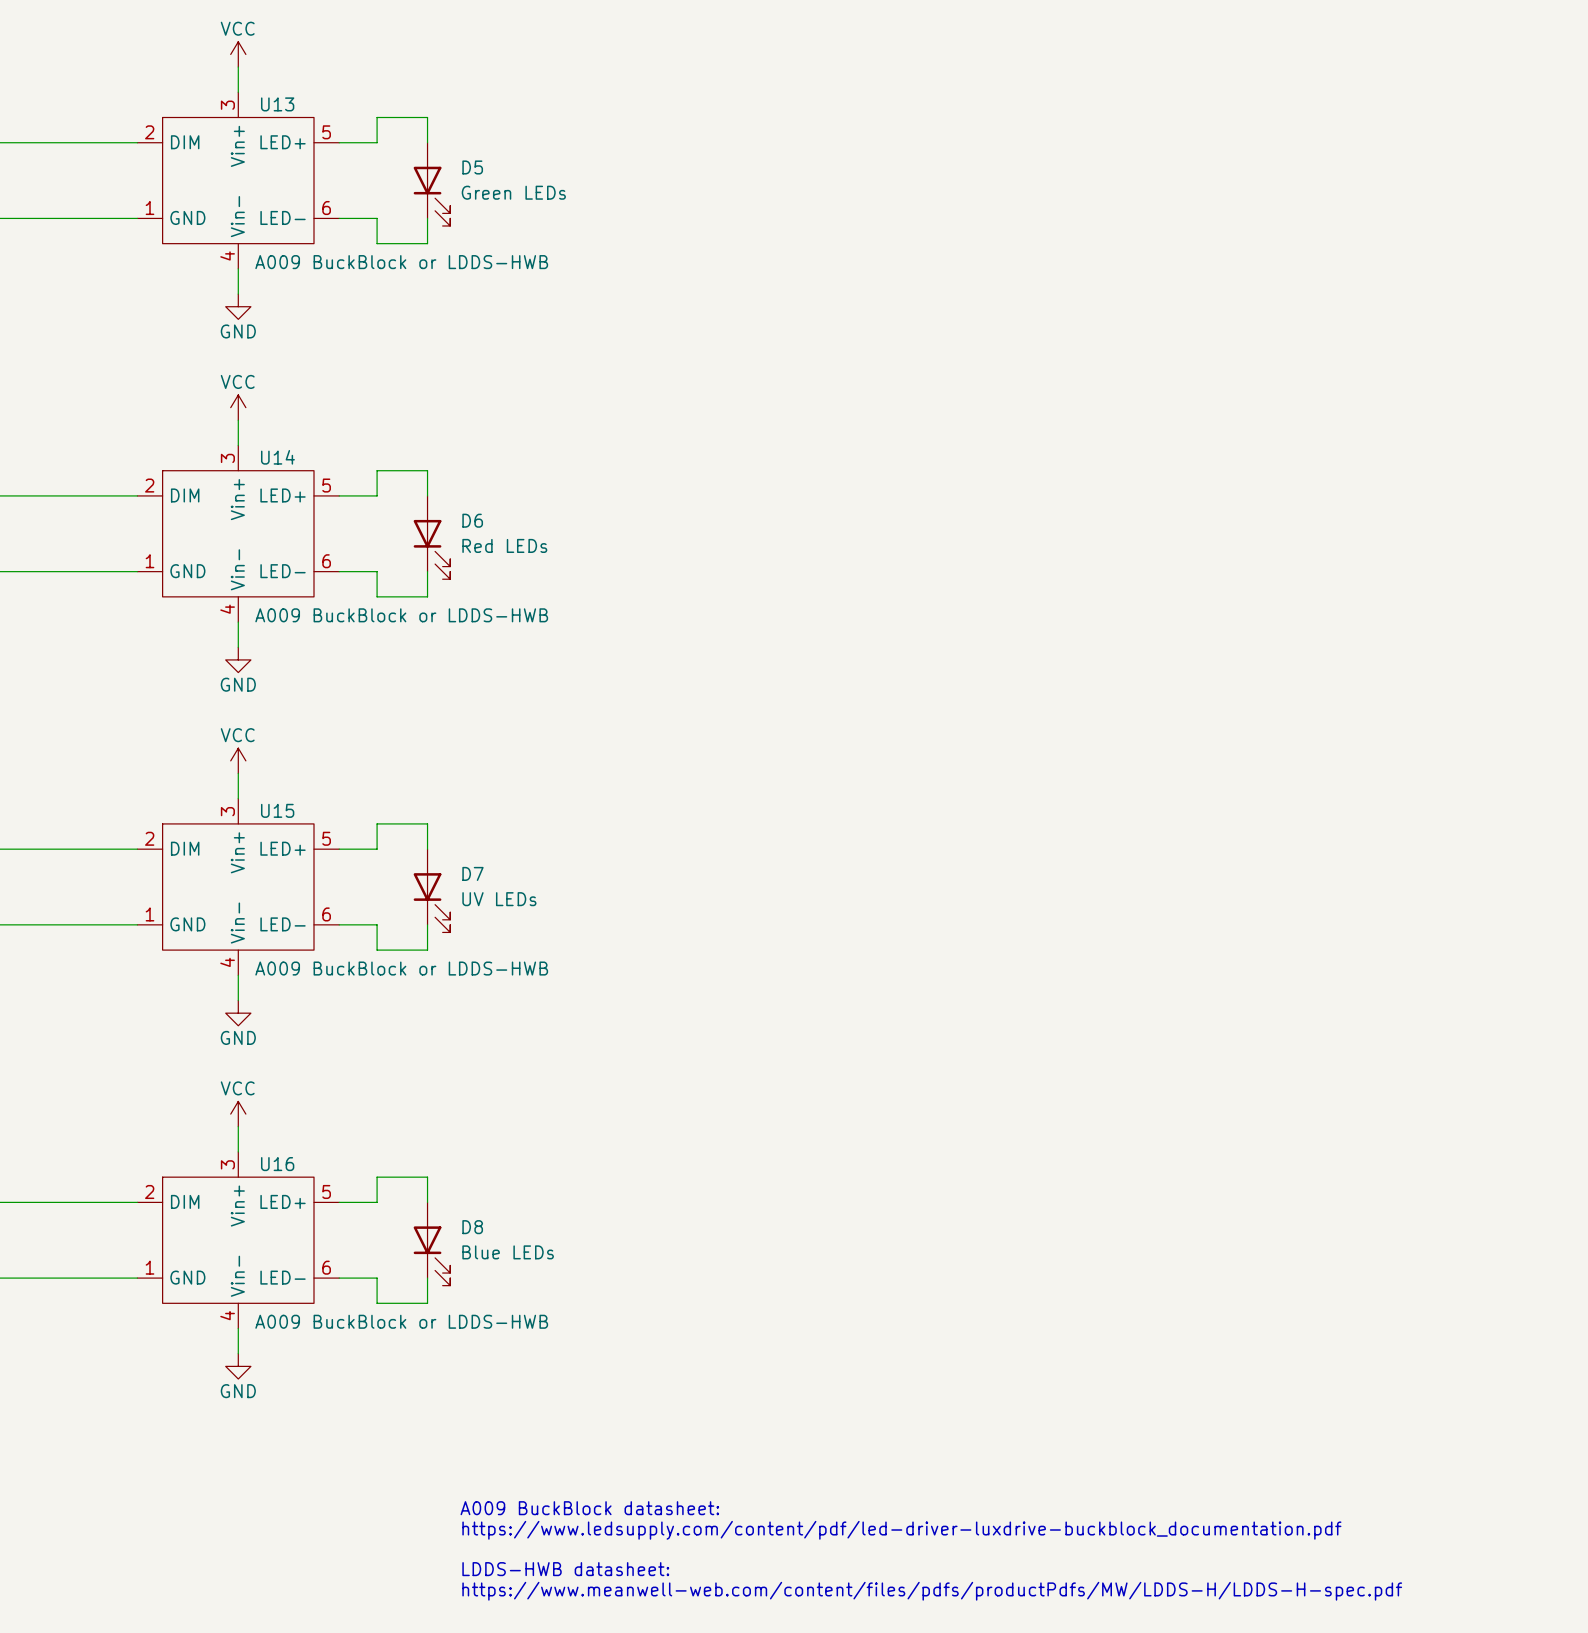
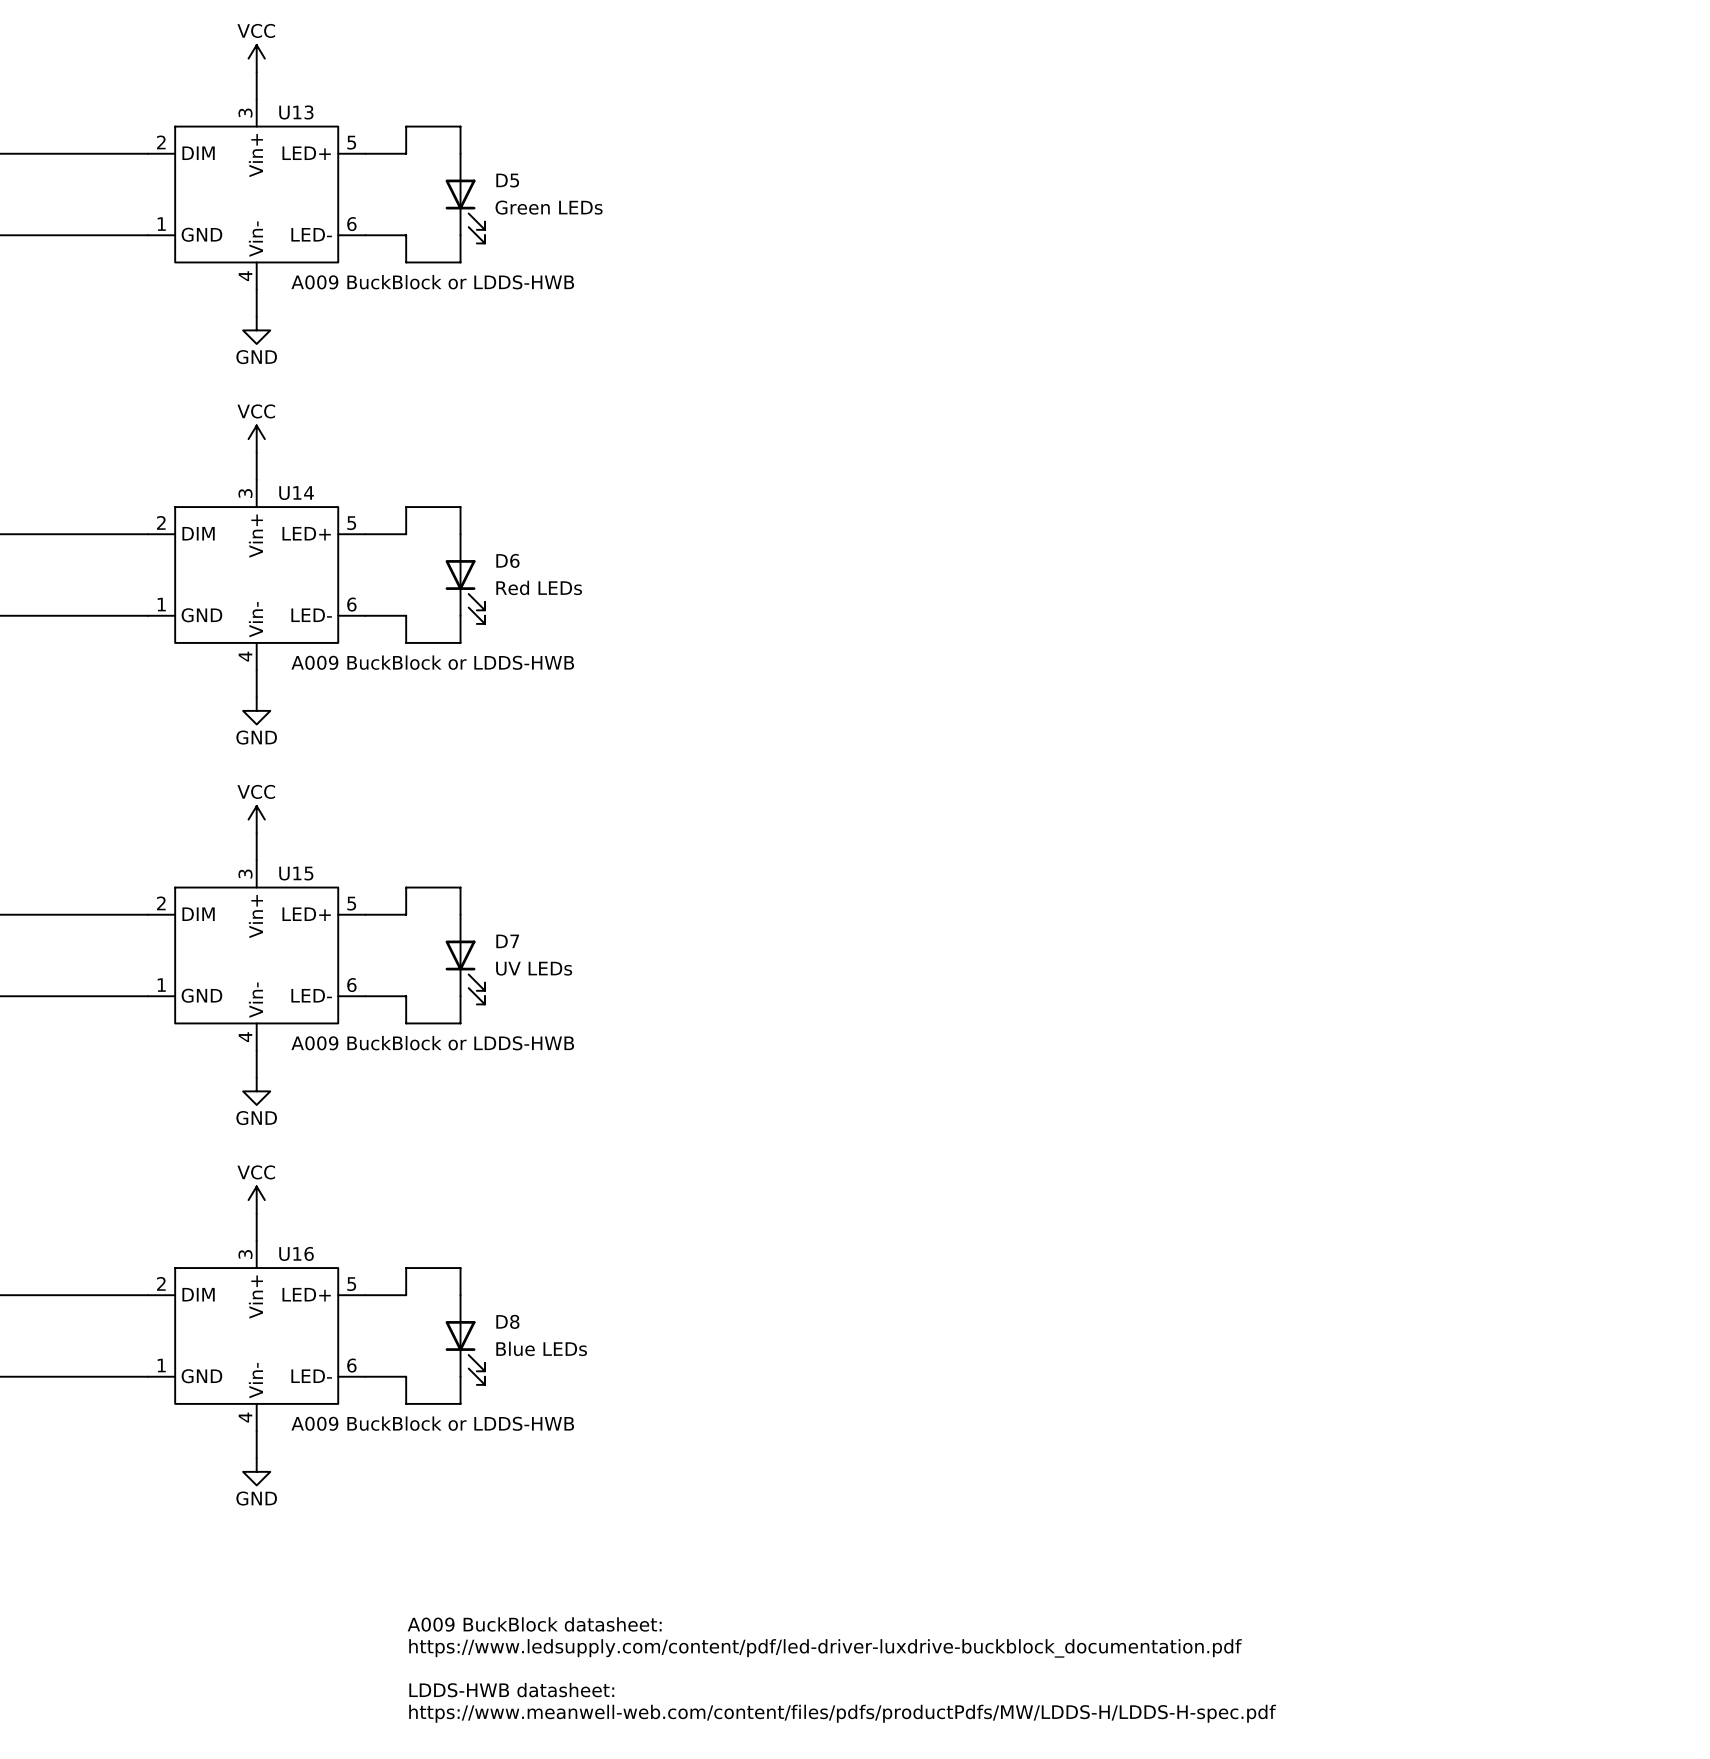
text position: A009 BuckBlock datasheet: (589, 1508) -> A009 BuckBlock datasheet: (534, 1624)
text position: https://www.ledsupply.com/content/pdf/led-driver-luxdrive-buckblock_documentation.pdf (901, 1530) -> https://www.ledsupply.com/content/pdf/led-driver-luxdrive-buckblock_documentation.pdf (825, 1648)
text position: LDDS-HWB datasheet: (565, 1569) -> LDDS-HWB datasheet: (511, 1690)
text position: https://www.meanwell-web.com/content/files/pdfs/productPdfs/MW/LDDS-H/LDDS-H-spec.pdf (932, 1591) -> https://www.meanwell-web.com/content/files/pdfs/productPdfs/MW/LDDS-H/LDDS-H-spec.pdf (842, 1713)

